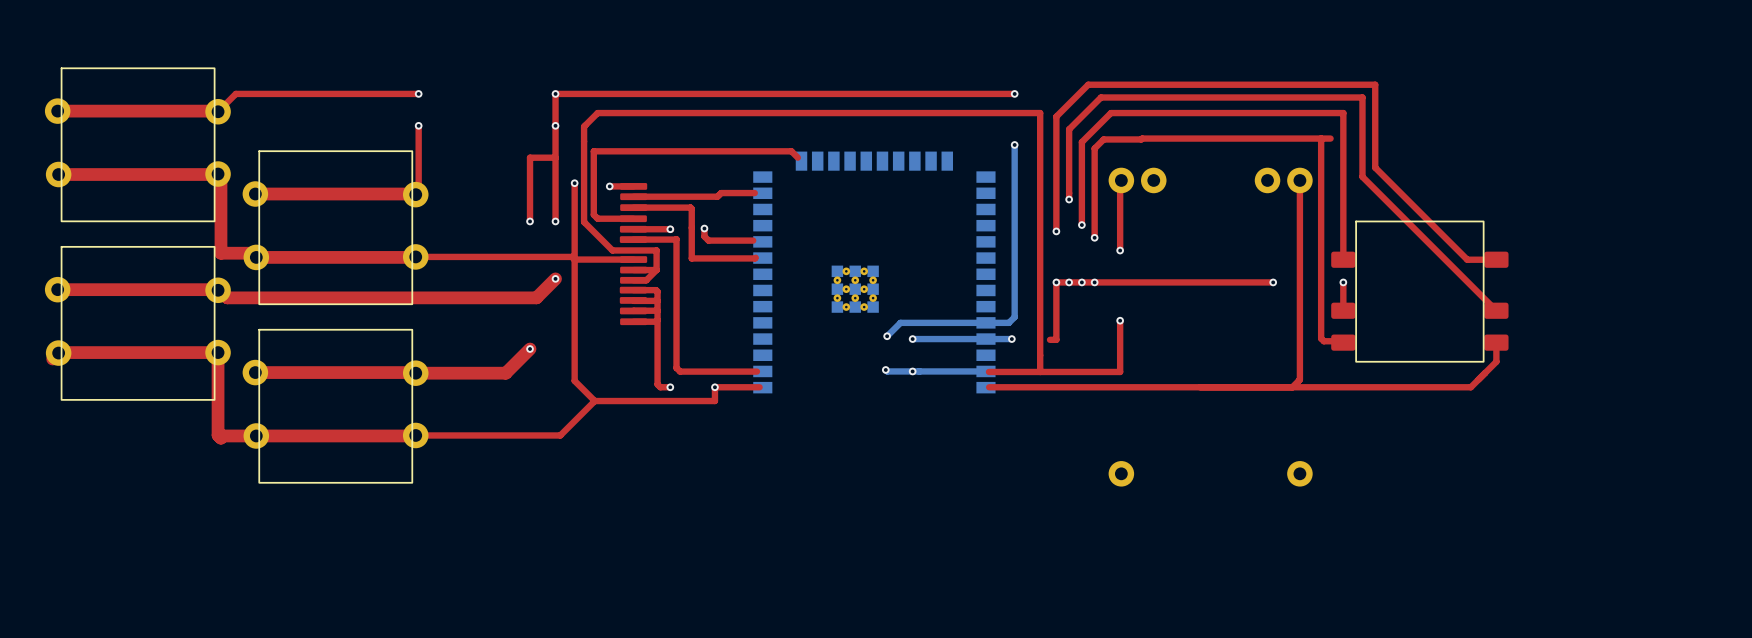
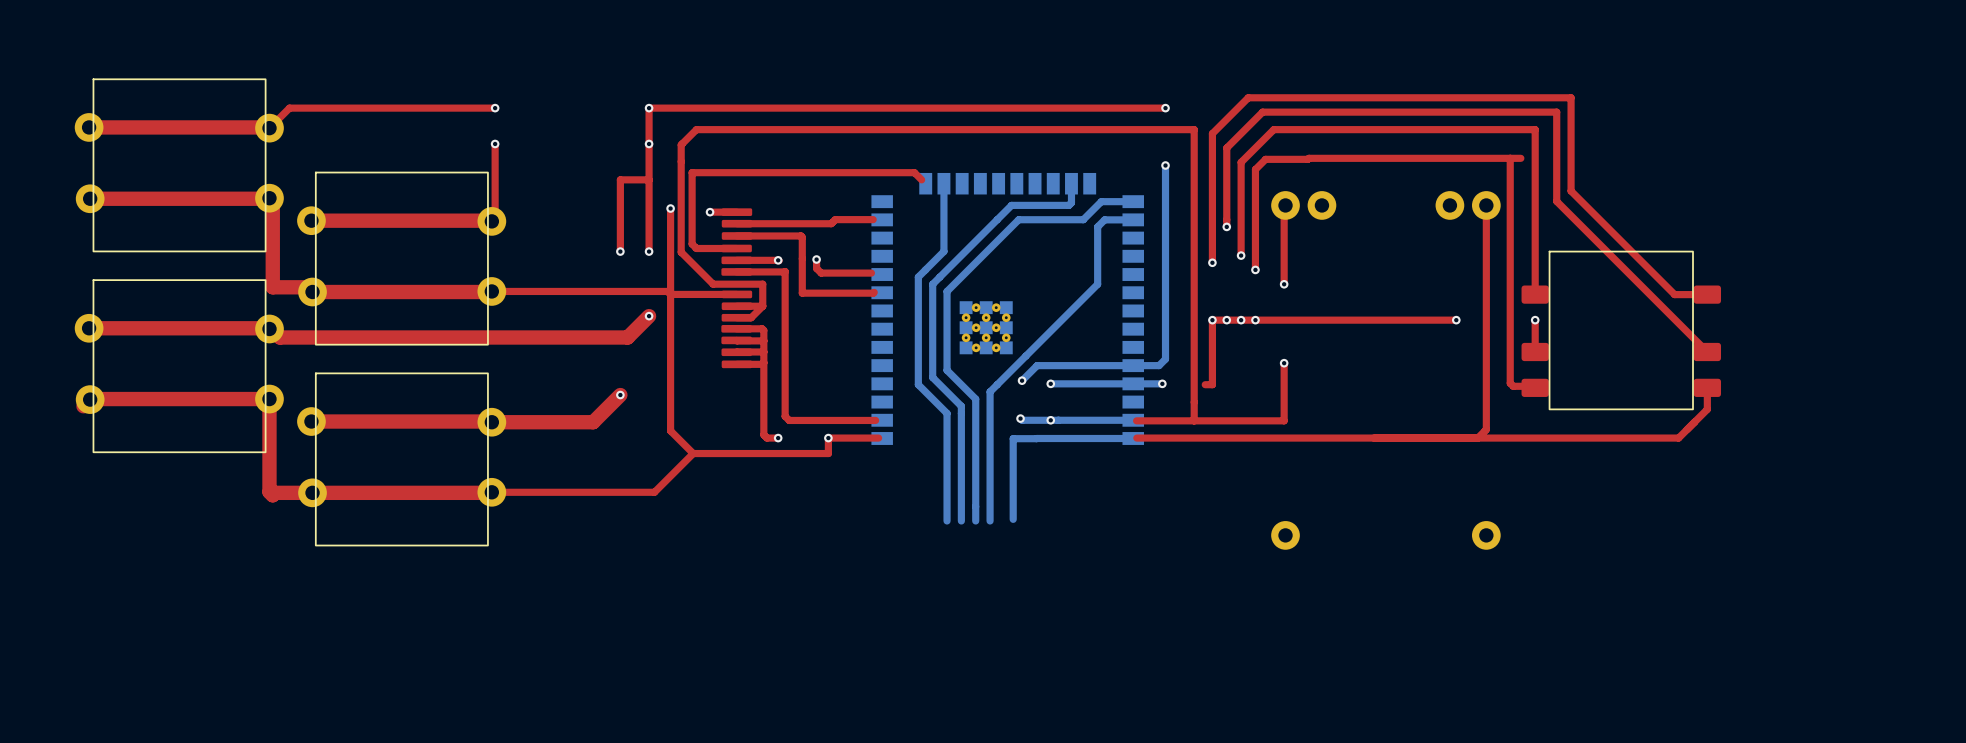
bottom track: none -> (943, 183) (943, 251) (918, 277) (918, 384) (947, 413) (947, 520)
bottom track: none -> (1071, 183) (1071, 202) (1068, 205) (1011, 205) (932, 284) (932, 377) (961, 406) (961, 520)
bottom track: none -> (1133, 201) (1101, 201) (1083, 219) (1018, 219) (947, 291) (947, 370) (975, 399) (975, 520)
bottom track: none -> (1133, 219) (1104, 219) (1097, 226) (1097, 284) (990, 391) (990, 520)
bottom track: none -> (1036, 438) (1013, 438) (1013, 519)
bottom track: none -> (1036, 438) (1133, 438)

